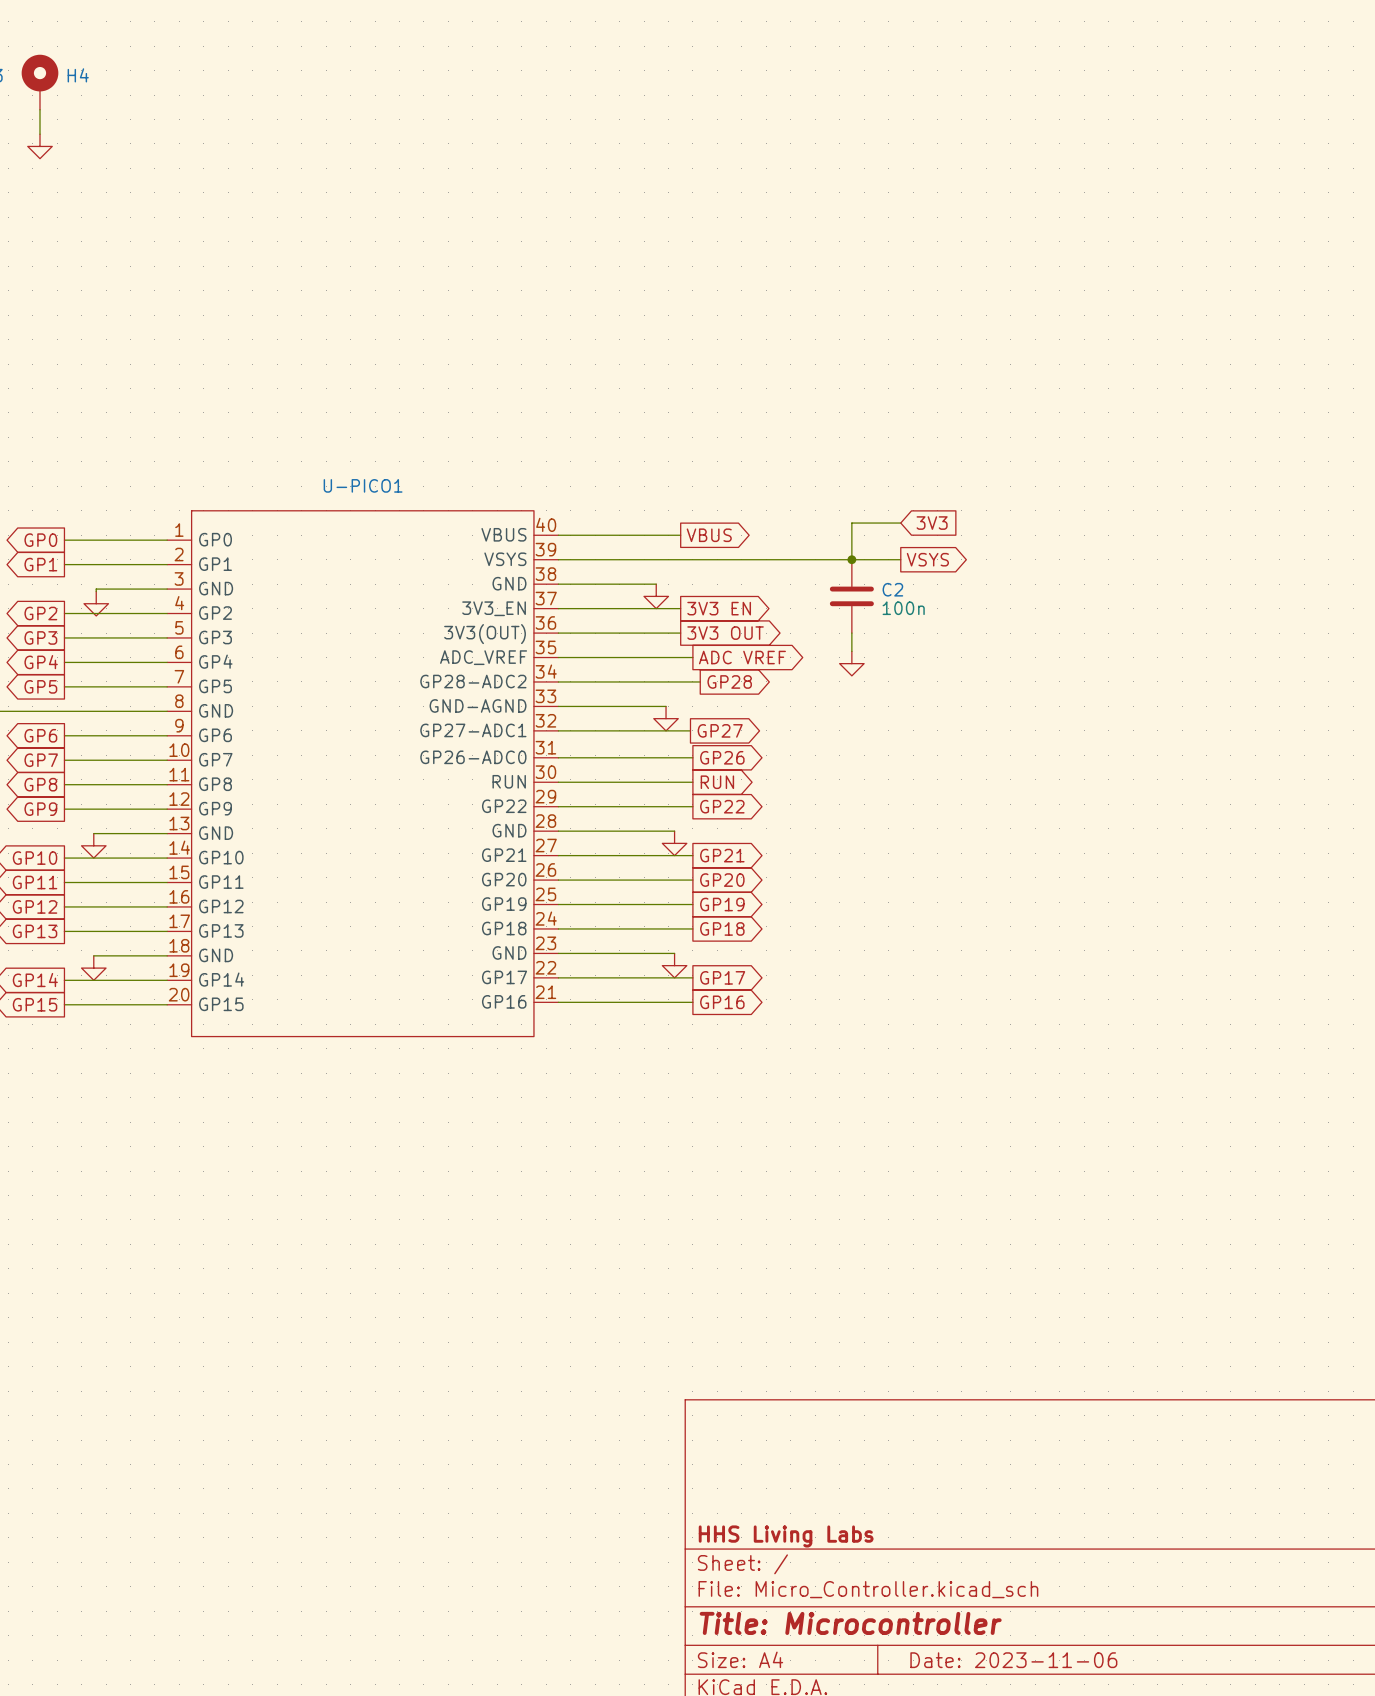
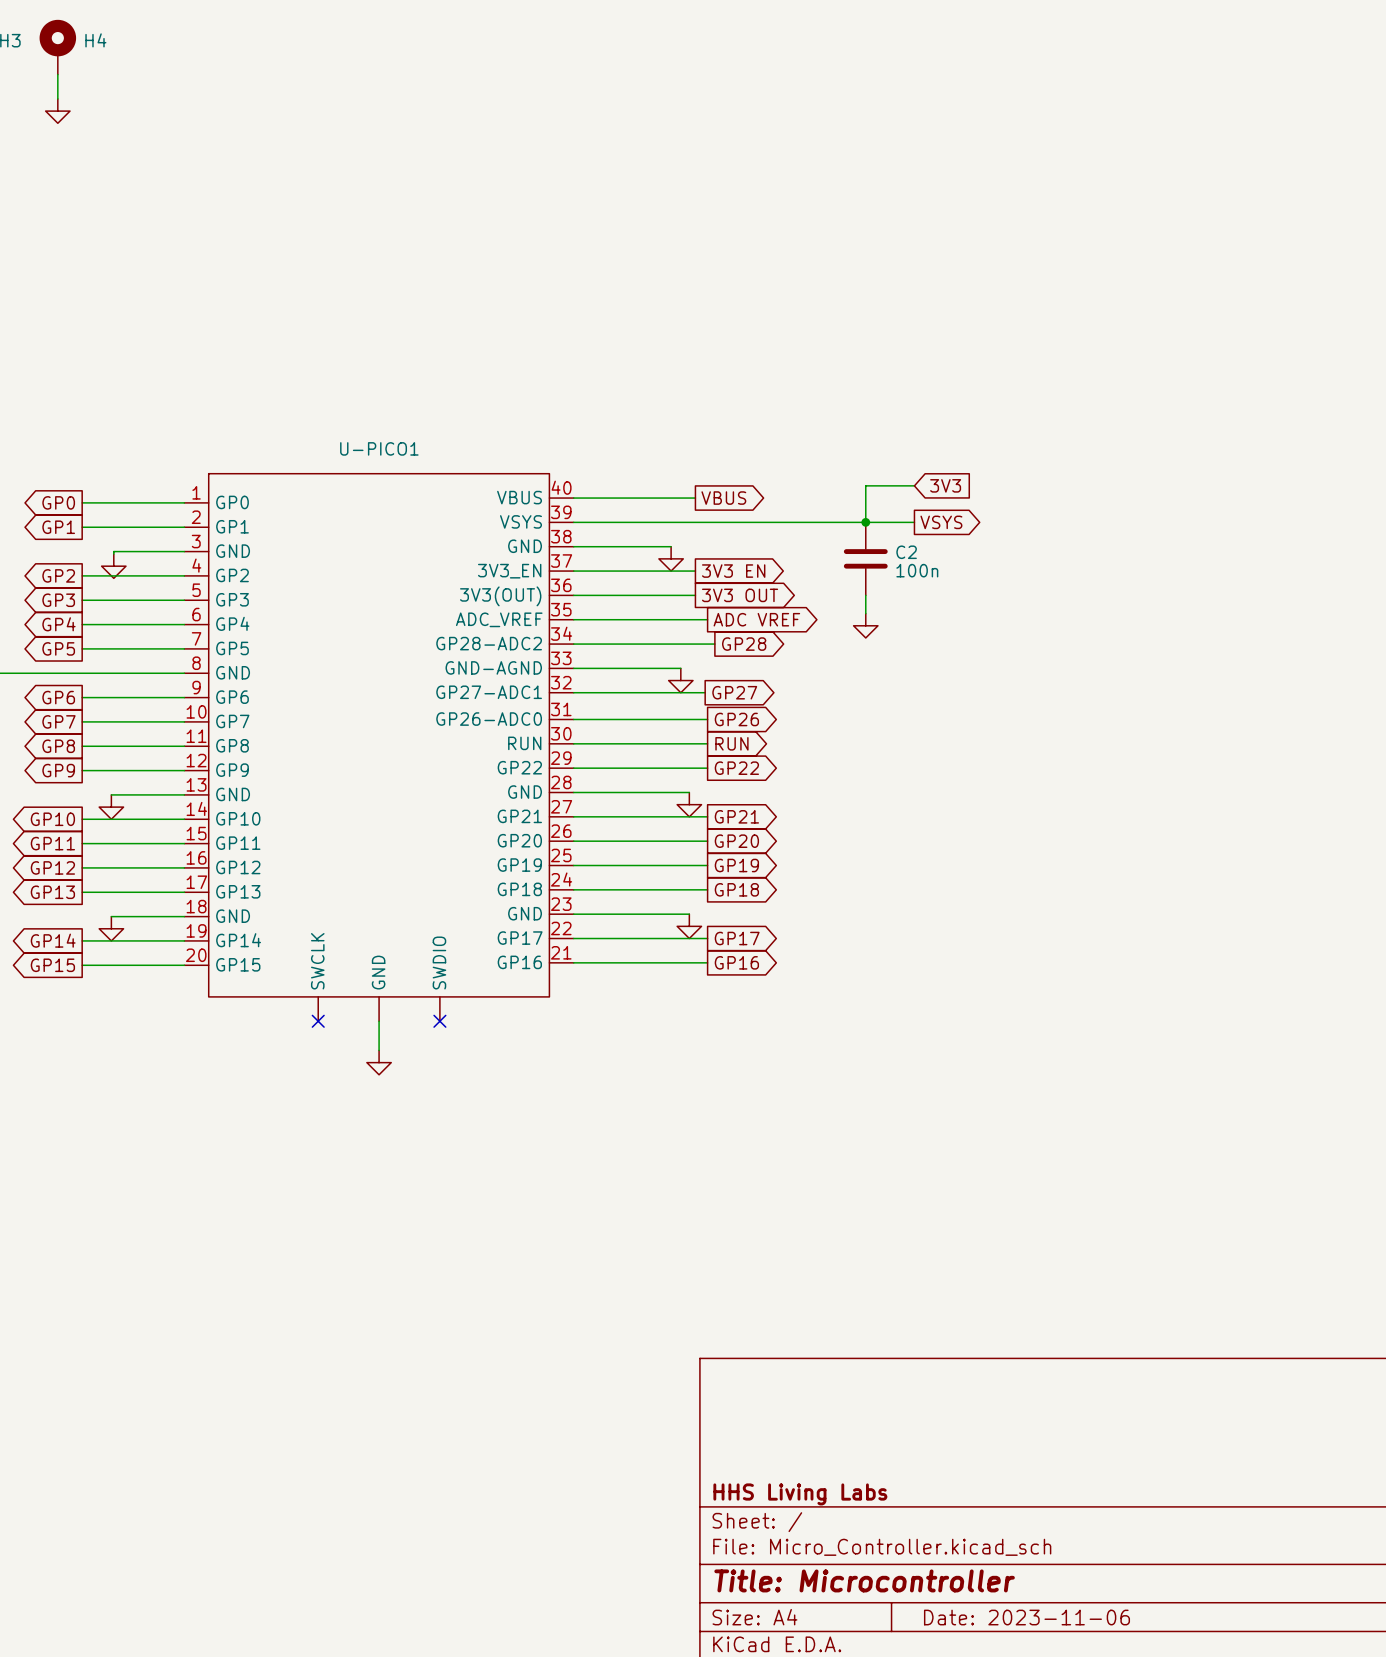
U-PICO1 symbol: [167, 510, 559, 1037] -> [184, 473, 574, 1022]
no-connect mark: none -> (318, 1021)
wire: none -> (379, 1021) (379, 1050)
no-connect mark: none -> (439, 1021)
power symbol: none -> (379, 1062)

